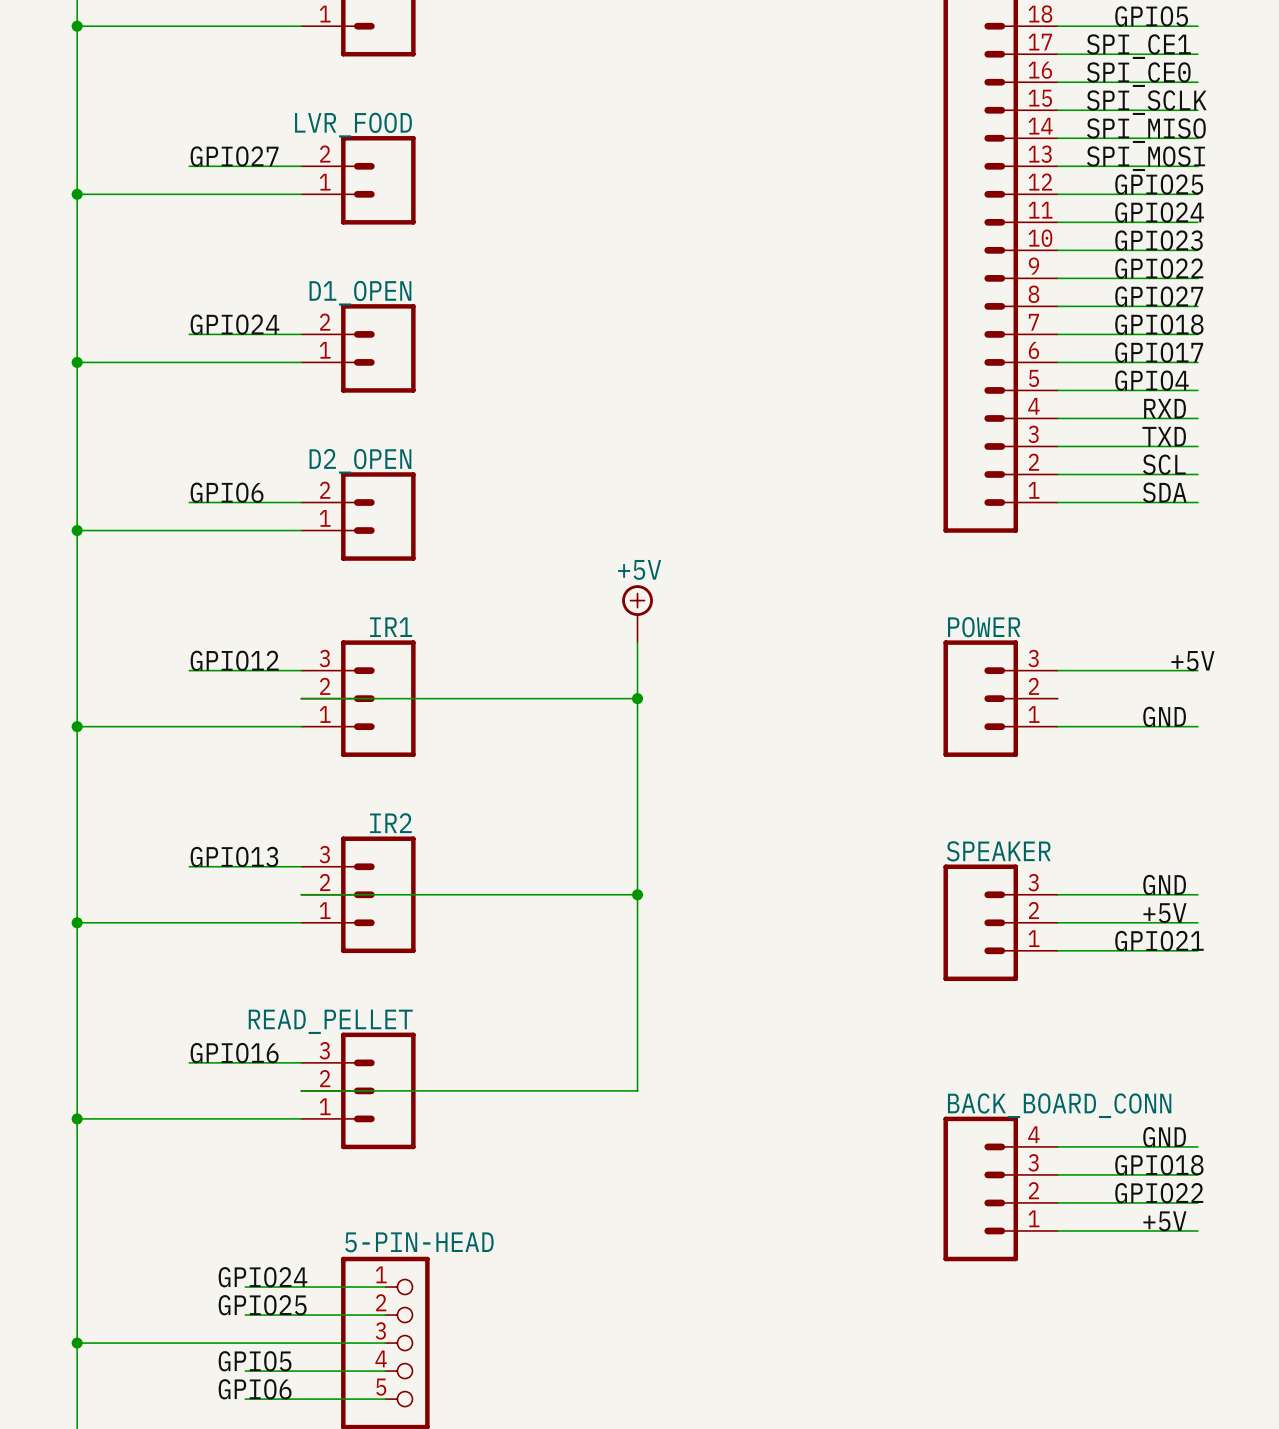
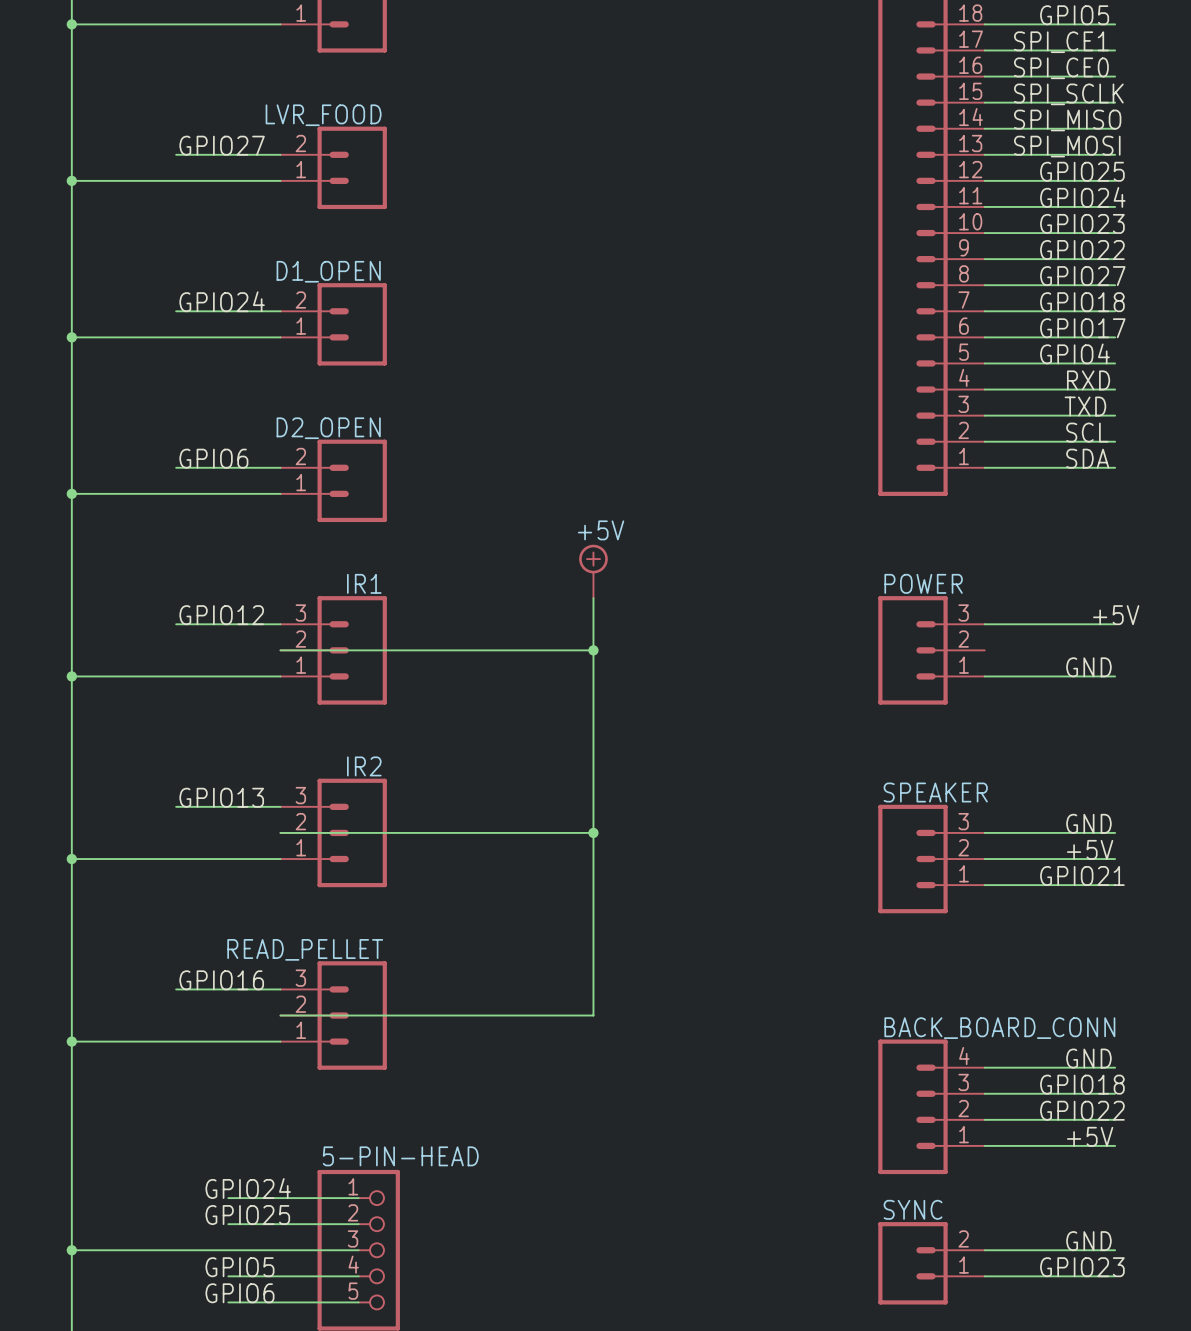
label: none -> GND (1088, 1241)
wire: none -> (984, 1250) (1115, 1250)
SYNC: none -> (931, 1263)
label: none -> GPIO23 (1082, 1267)
wire: none -> (984, 1276) (1115, 1276)

